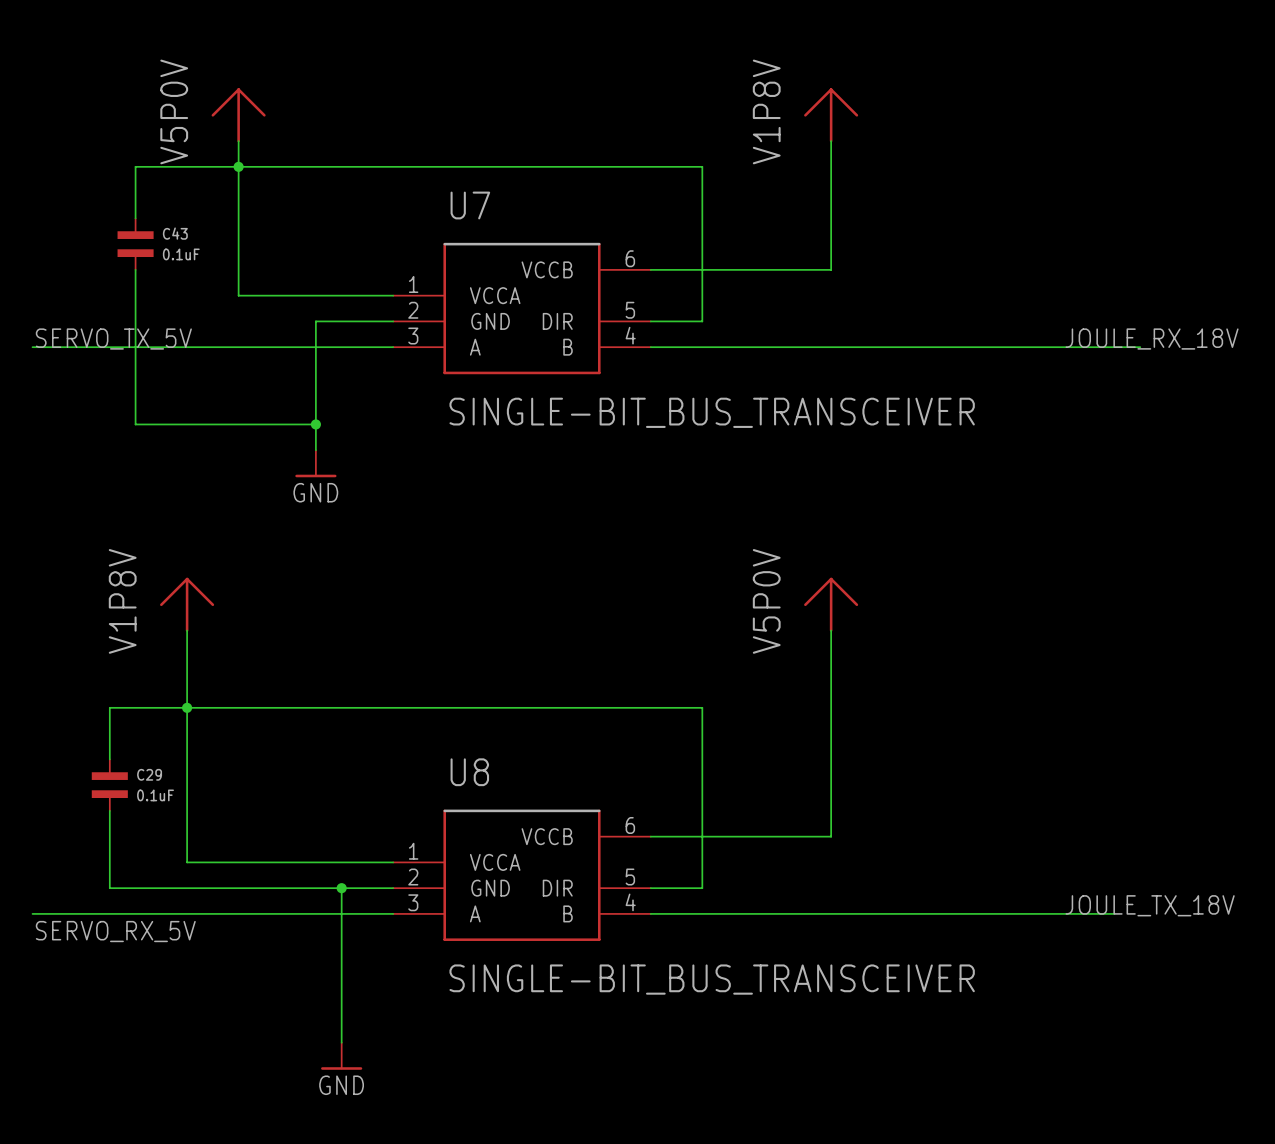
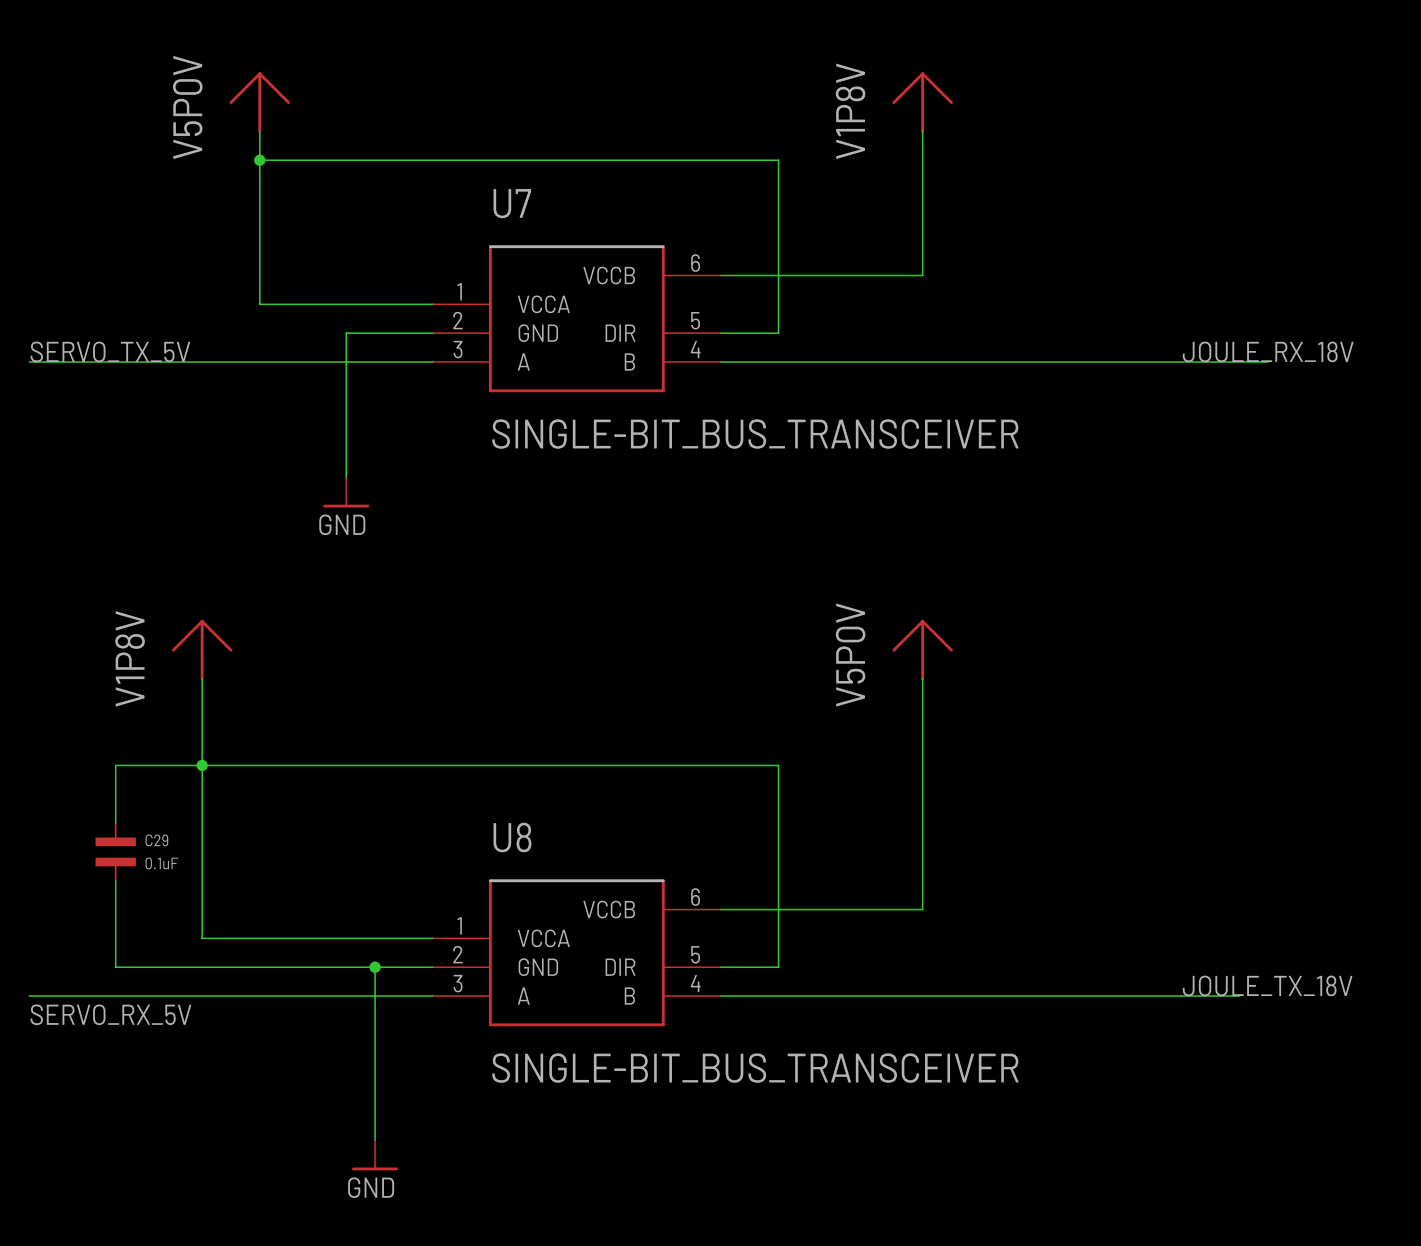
wire: (238, 166) (135, 166) (135, 218) -> none
C43: 0.1uF (135, 244) -> none
wire: (135, 269) (135, 424) (315, 424) -> none
junction: (315, 424) -> none

